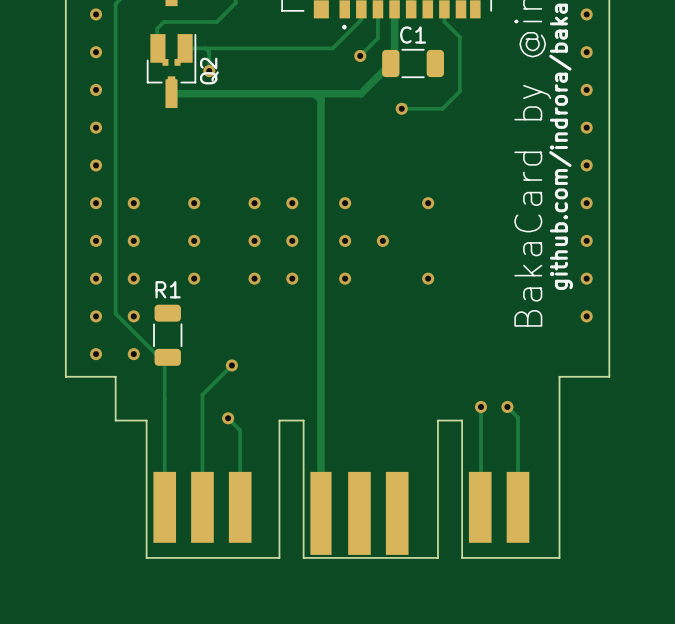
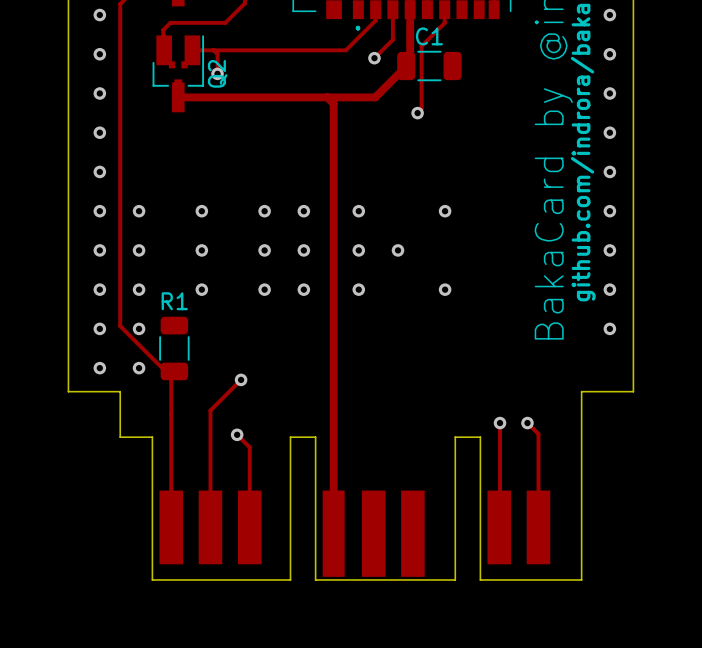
track: none -> (444, 9) (444, 23) (421, 46) (421, 109)
track: (444, 9) (444, 21) (459, 37) (459, 91) (442, 108) (401, 108) -> none

